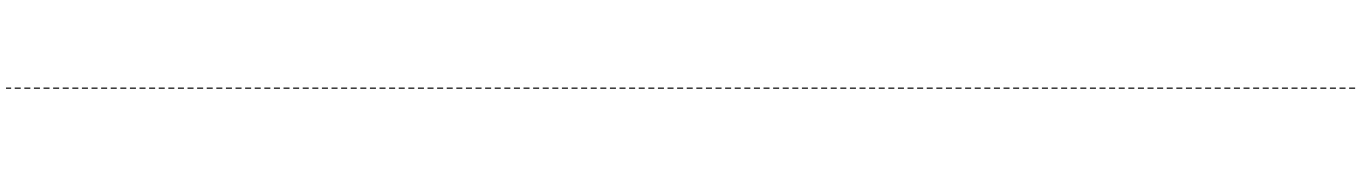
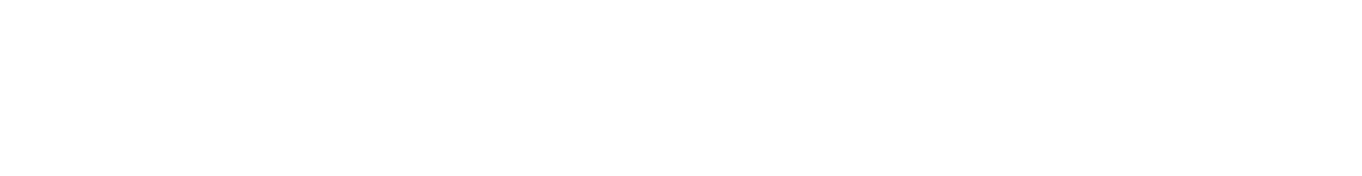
line: (6, 88) (1355, 88) -> none

